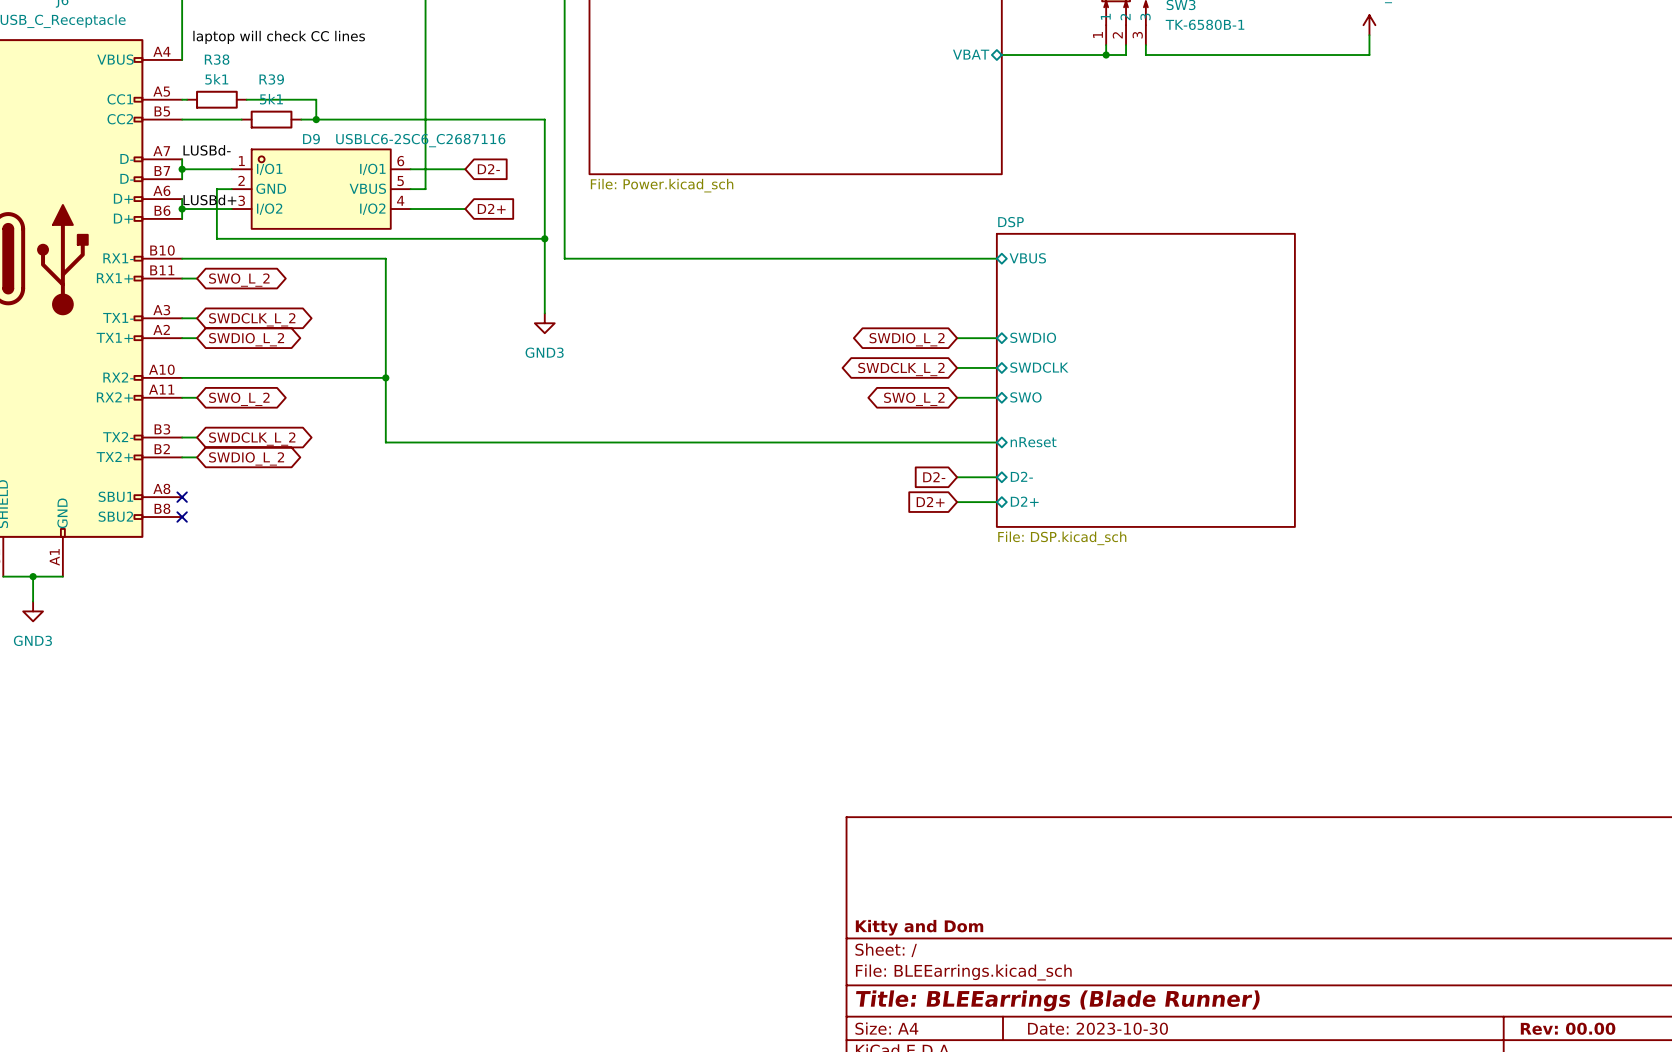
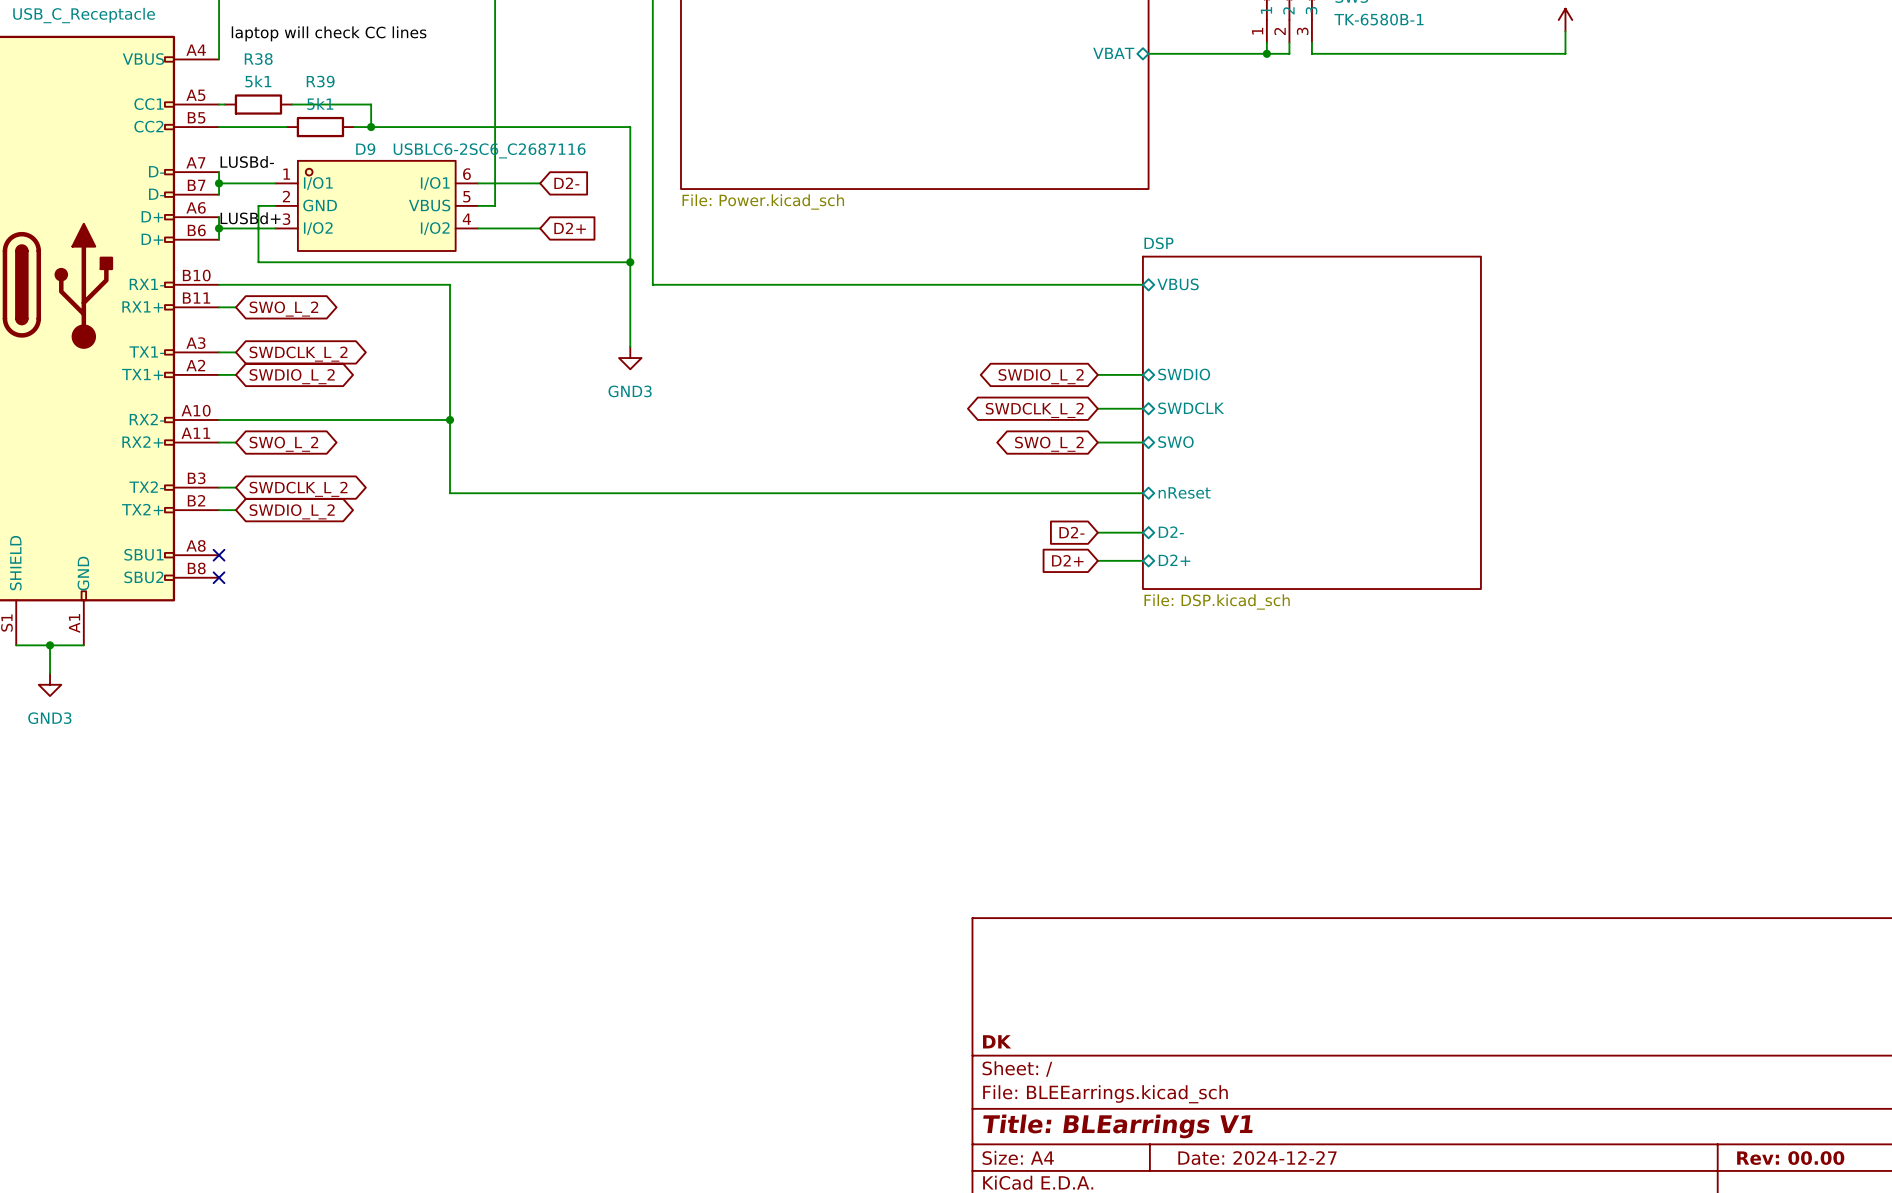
title block: Kitty and Dom (919, 927) -> DK (997, 1041)
title block: Title: BLEEarrings (Blade Runner) (1057, 1000) -> Title: BLEarrings V1 (1117, 1126)
title block: Date: 2023-10-30 (1098, 1028) -> Date: 2024-12-27 (1257, 1158)

